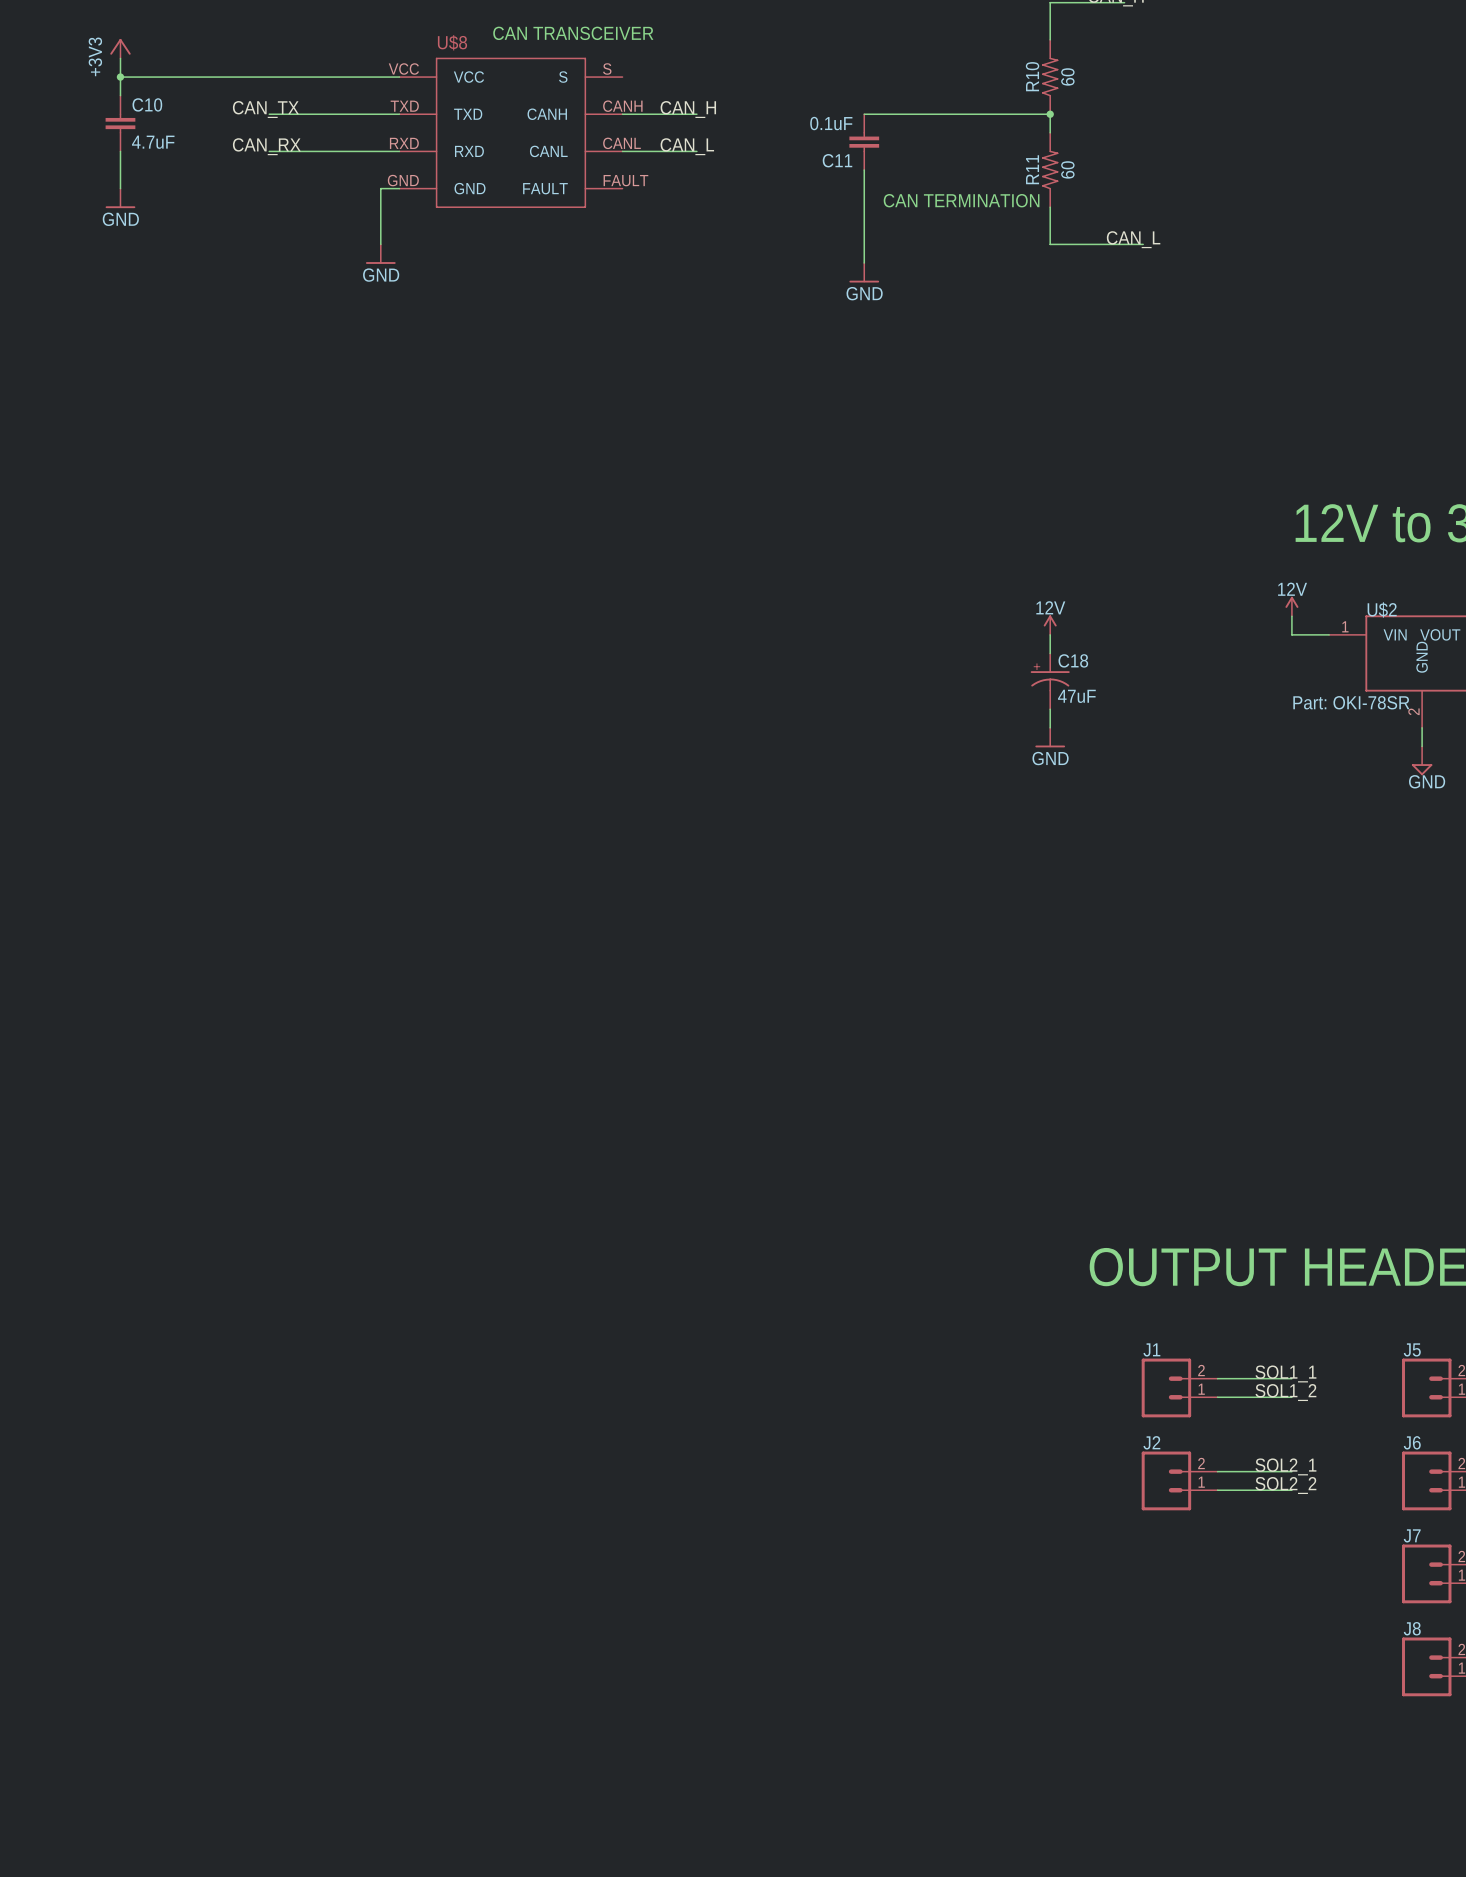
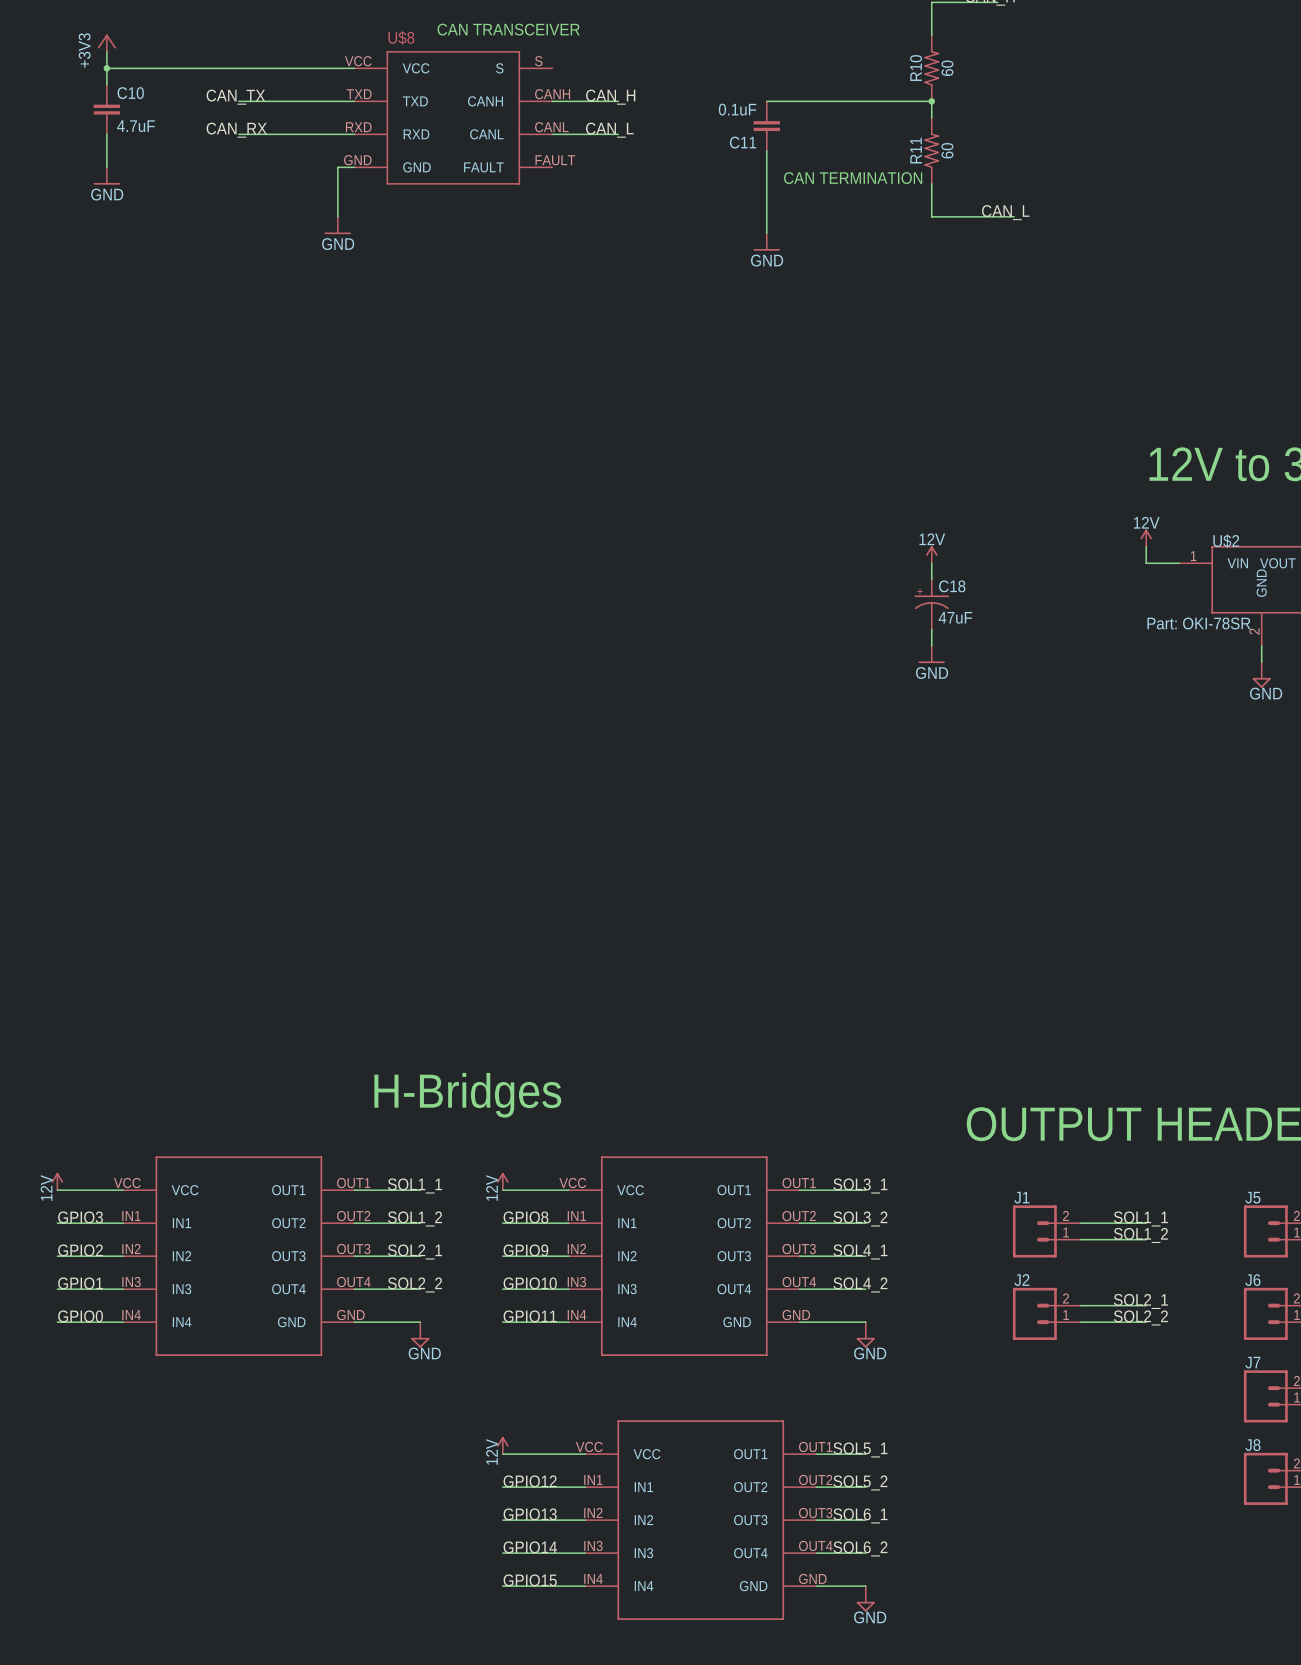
text: none -> H-Bridges (467, 1095)
power symbol: none -> 12V (57, 1181)
power symbol: none -> 12V (502, 1181)
label: none -> SOL1_1 (415, 1185)
label: none -> SOL3_1 (860, 1185)
wire: none -> (57, 1190) (123, 1190)
wire: none -> (354, 1190) (420, 1190)
wire: none -> (502, 1190) (568, 1190)
wire: none -> (799, 1190) (865, 1190)
label: none -> GPIO3 (80, 1217)
label: none -> GPIO8 (525, 1217)
label: none -> SOL1_2 (415, 1218)
label: none -> SOL3_2 (860, 1218)
wire: none -> (57, 1223) (123, 1223)
wire: none -> (354, 1223) (420, 1223)
wire: none -> (502, 1223) (568, 1223)
wire: none -> (799, 1223) (865, 1223)
label: none -> GPIO2 (80, 1250)
label: none -> GPIO9 (525, 1250)
label: none -> SOL2_1 (415, 1251)
label: none -> SOL4_1 (860, 1251)
wire: none -> (57, 1256) (123, 1256)
part: none -> (238, 1256)
wire: none -> (354, 1256) (420, 1256)
wire: none -> (502, 1256) (568, 1256)
part: none -> (684, 1256)
wire: none -> (799, 1256) (865, 1256)
label: none -> GPIO1 (80, 1283)
label: none -> GPIO10 (530, 1283)
label: none -> SOL2_2 (415, 1284)
label: none -> SOL4_2 (860, 1284)
wire: none -> (57, 1289) (123, 1289)
wire: none -> (354, 1289) (420, 1289)
wire: none -> (502, 1289) (568, 1289)
wire: none -> (799, 1289) (865, 1289)
label: none -> GPIO0 (80, 1316)
label: none -> GPIO11 (530, 1316)
wire: none -> (57, 1322) (123, 1322)
wire: none -> (354, 1322) (420, 1322)
wire: none -> (502, 1322) (568, 1322)
wire: none -> (799, 1322) (865, 1322)
power symbol: none -> GND (420, 1334)
power symbol: none -> GND (865, 1334)
power symbol: none -> 12V (502, 1445)
label: none -> SOL5_1 (860, 1449)
wire: none -> (502, 1454) (585, 1454)
wire: none -> (816, 1454) (865, 1454)
label: none -> GPIO12 (530, 1481)
label: none -> SOL5_2 (860, 1482)
wire: none -> (502, 1487) (585, 1487)
wire: none -> (816, 1487) (865, 1487)
label: none -> GPIO13 (530, 1514)
label: none -> SOL6_1 (860, 1515)
wire: none -> (502, 1520) (585, 1520)
part: none -> (700, 1520)
wire: none -> (816, 1520) (865, 1520)
label: none -> GPIO14 (530, 1547)
label: none -> SOL6_2 (860, 1548)
wire: none -> (502, 1553) (585, 1553)
wire: none -> (816, 1553) (865, 1553)
label: none -> GPIO15 (530, 1580)
wire: none -> (502, 1586) (585, 1586)
wire: none -> (816, 1586) (865, 1586)
power symbol: none -> GND (865, 1598)

